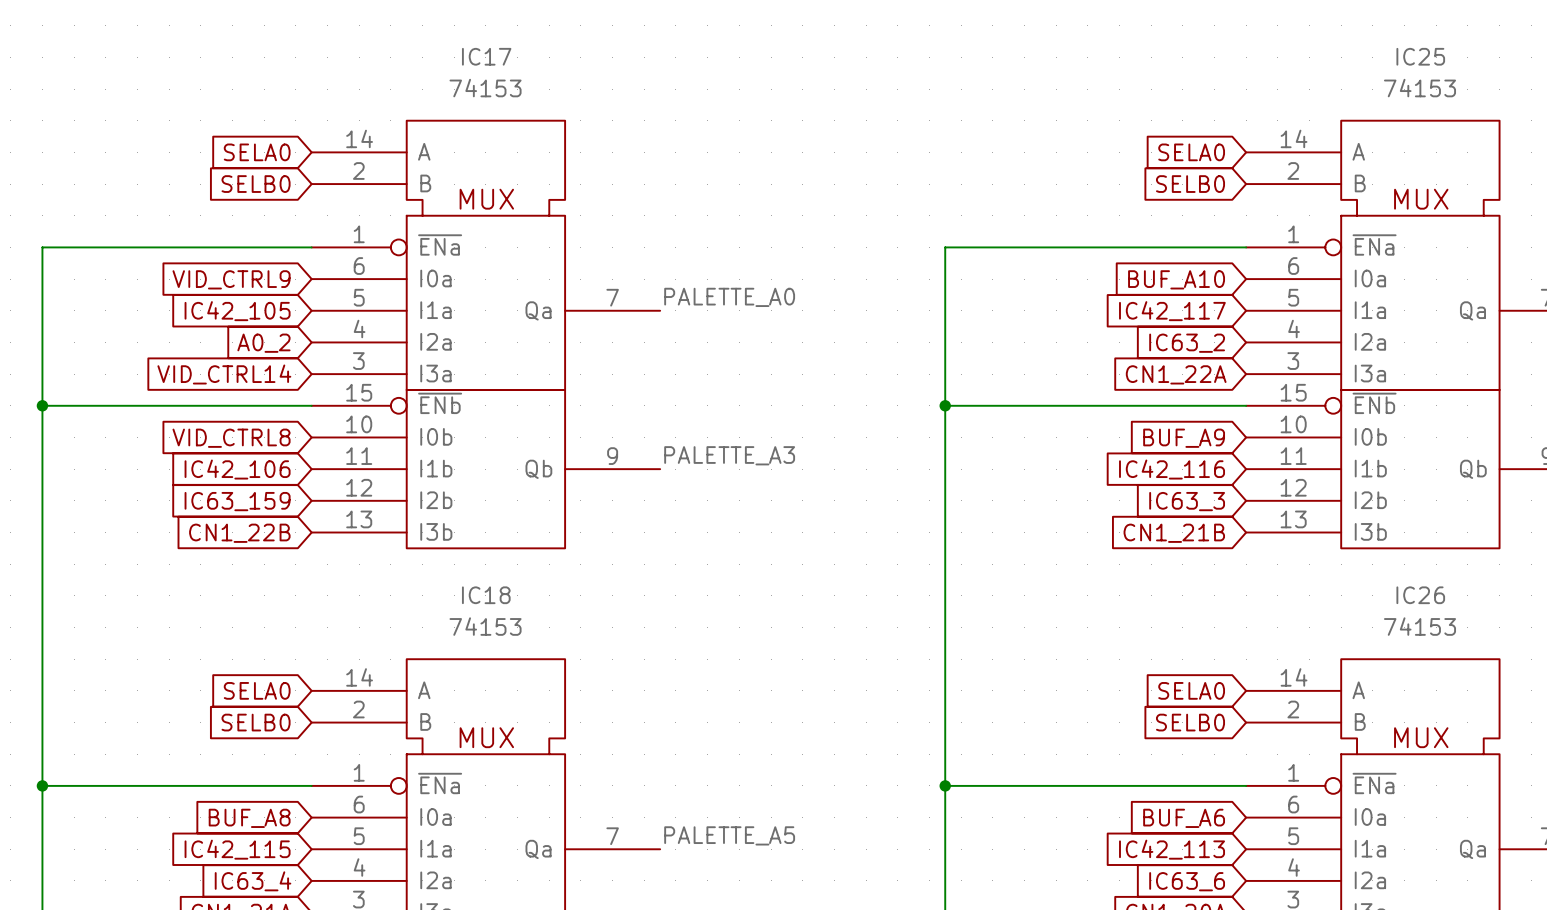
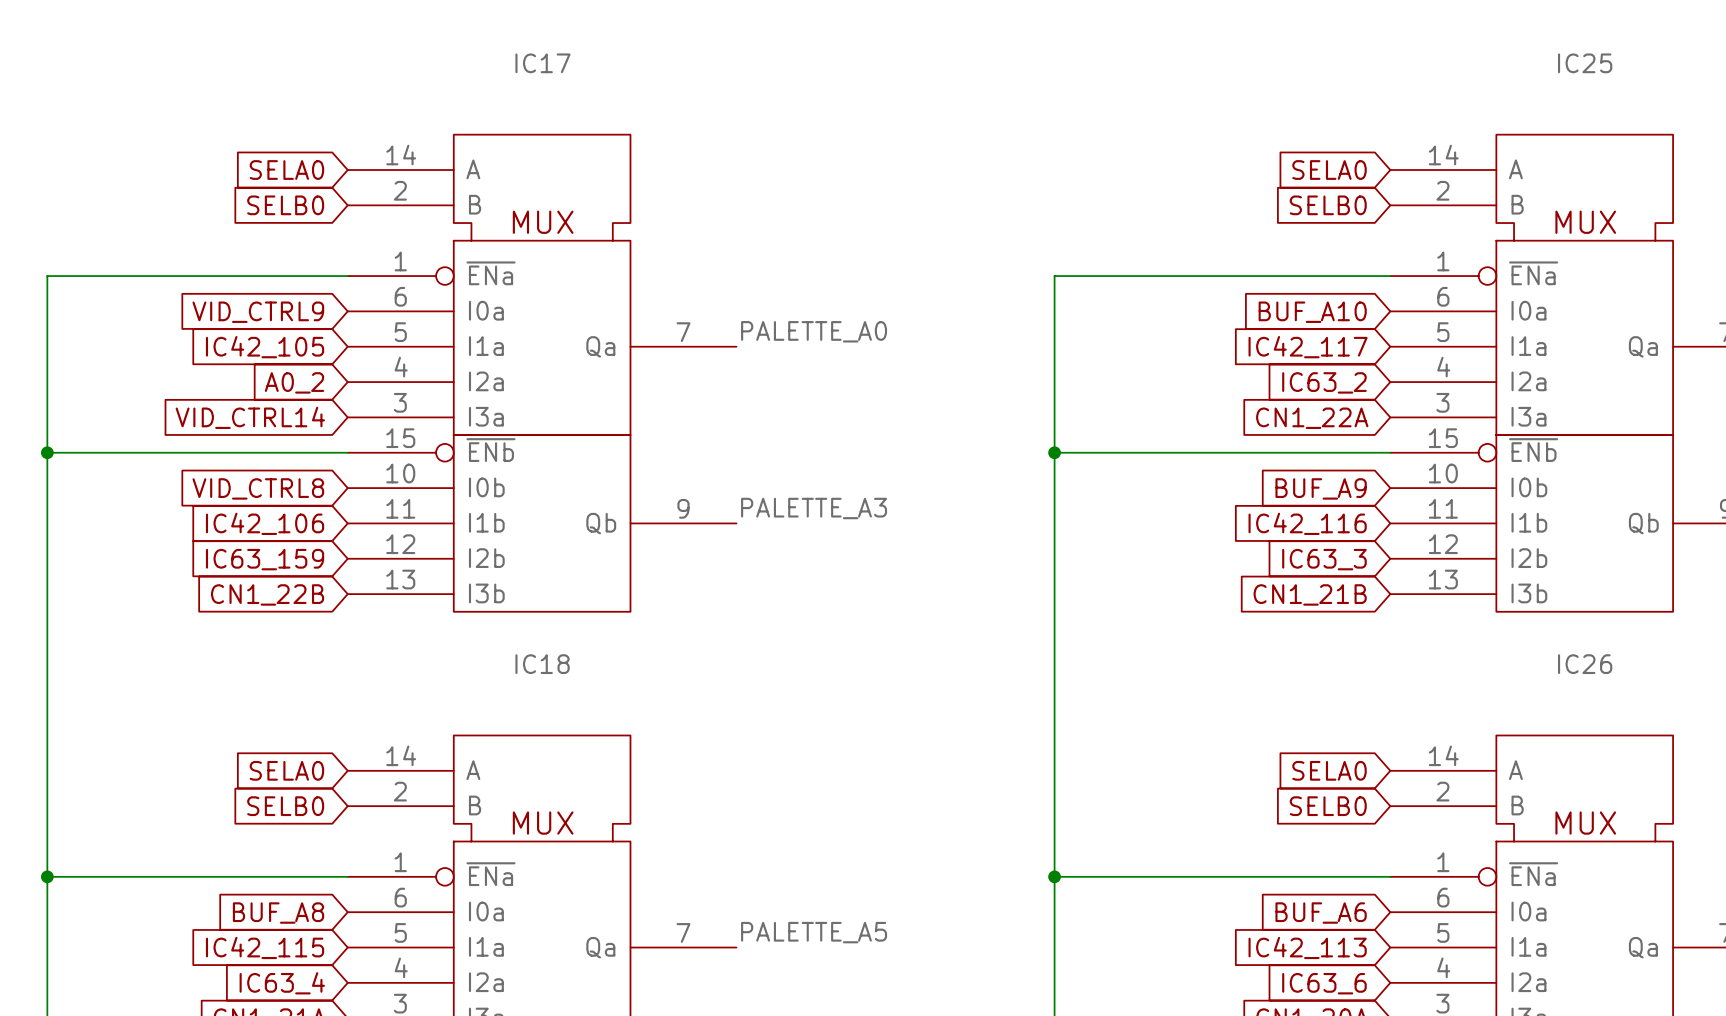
IC17 value: 74153 (485, 88) -> none
IC25 value: 74153 (1420, 88) -> none
IC18 value: 74153 (485, 626) -> none
IC26 value: 74153 (1420, 626) -> none

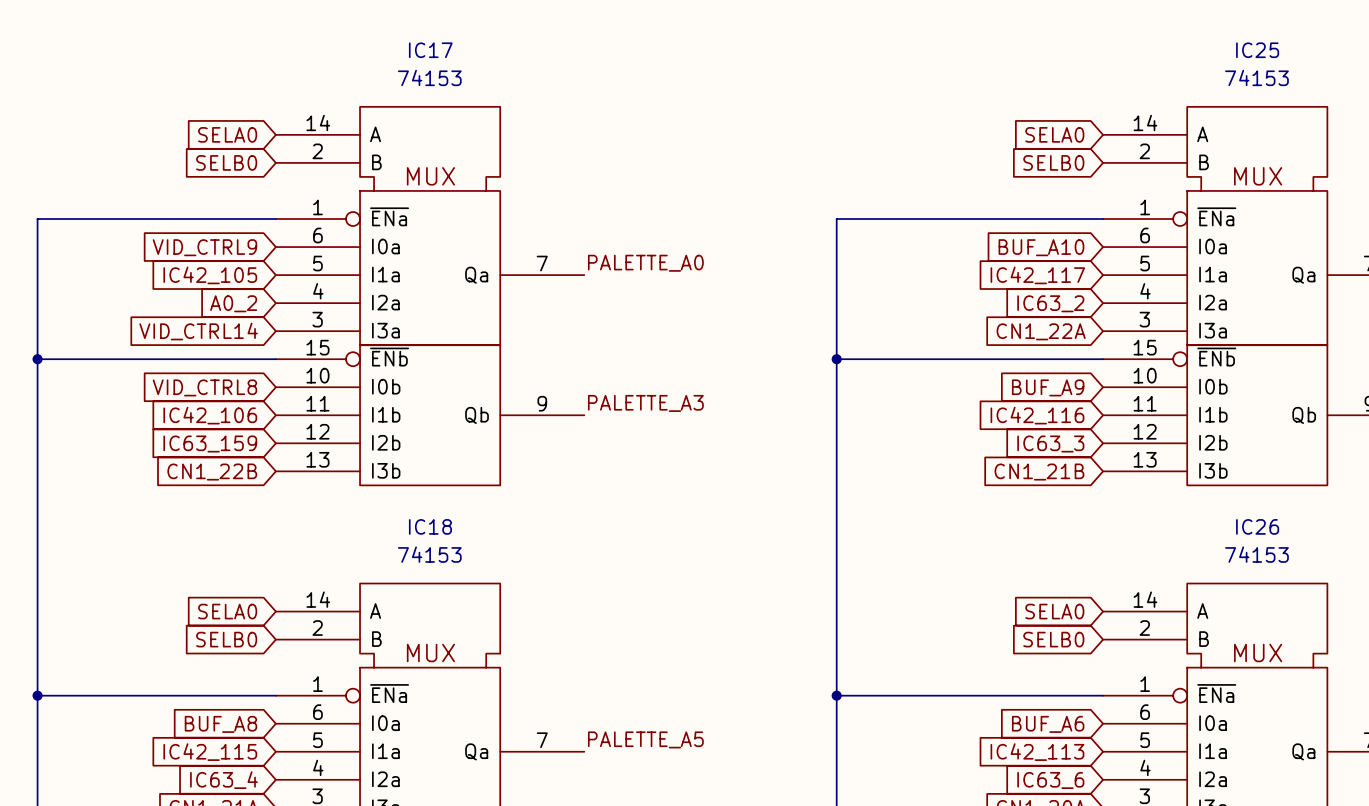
IC17 value: none -> 74153 (429, 77)
IC25 value: none -> 74153 (1256, 77)
IC18 value: none -> 74153 (429, 554)
IC26 value: none -> 74153 (1256, 554)

